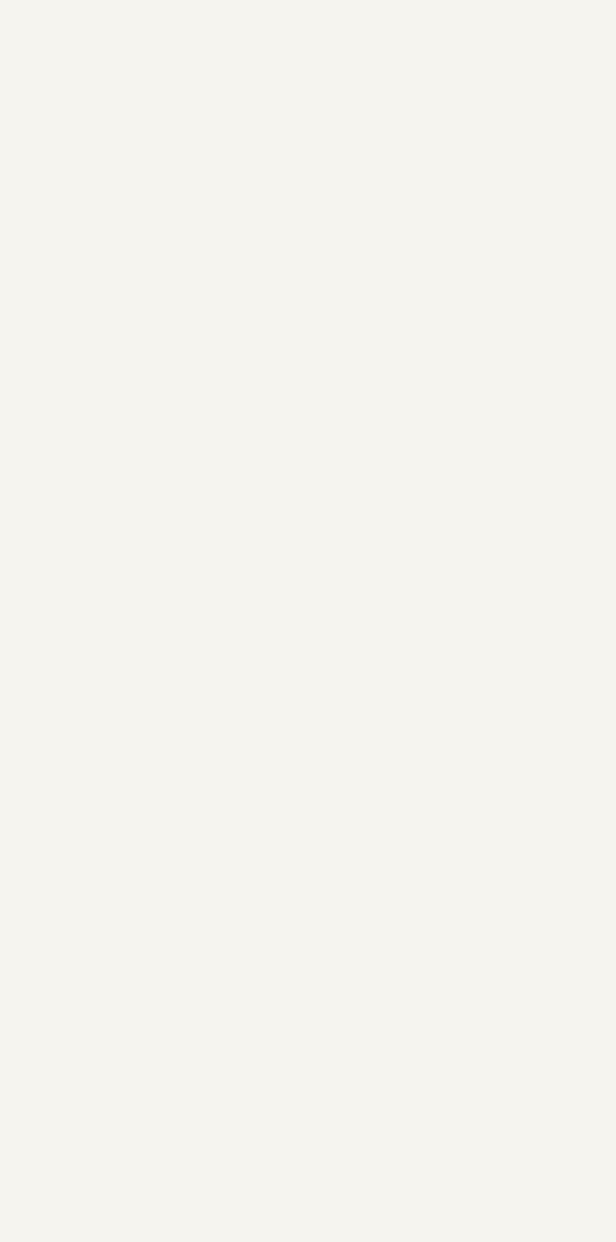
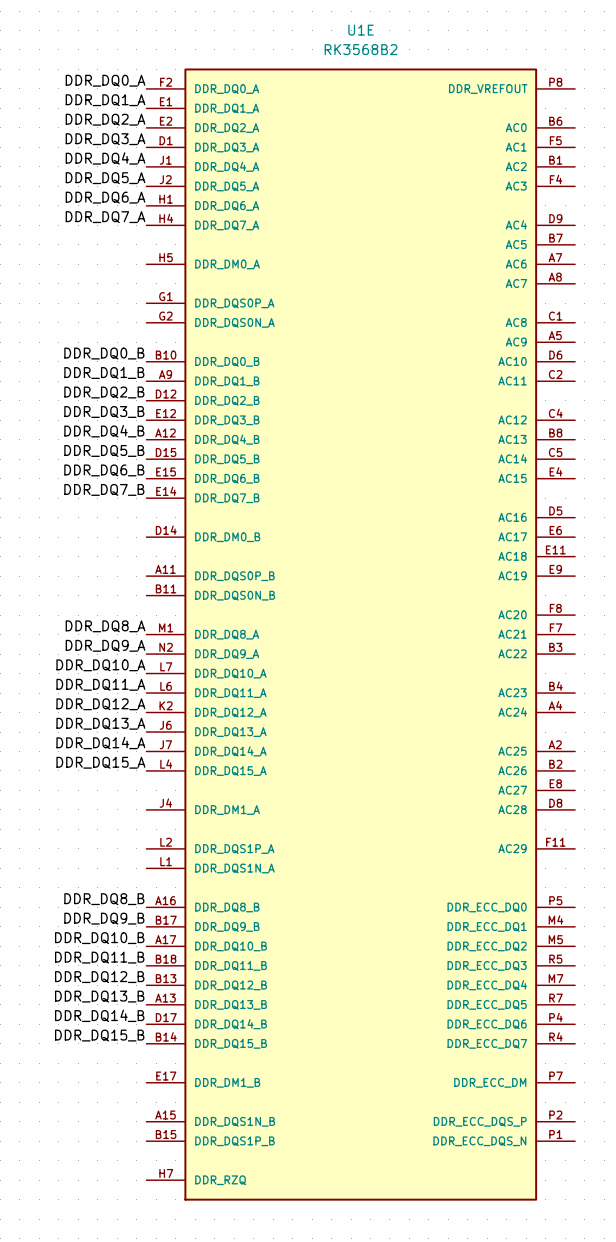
label: none -> DDR_DQ0_A (105, 80)
label: none -> DDR_DQ1_A (105, 100)
label: none -> DDR_DQ2_A (105, 119)
label: none -> DDR_DQ3_A (105, 139)
label: none -> DDR_DQ4_A (105, 158)
label: none -> DDR_DQ5_A (105, 178)
label: none -> DDR_DQ6_A (105, 197)
label: none -> DDR_DQ7_A (105, 217)
label: none -> DDR_DQ0_B (104, 353)
label: none -> DDR_DQ1_B (104, 373)
label: none -> DDR_DQ2_B (104, 392)
label: none -> DDR_DQ3_B (104, 411)
label: none -> DDR_DQ4_B (104, 431)
label: none -> DDR_DQ5_B (104, 450)
label: none -> DDR_DQ6_B (104, 470)
label: none -> DDR_DQ7_B (104, 489)
label: none -> DDR_DQ8_A (105, 626)
U1E: none -> RK3568B2 (360, 634)
label: none -> DDR_DQ9_A (105, 645)
label: none -> DDR_DQ10_A (100, 665)
label: none -> DDR_DQ11_A (100, 684)
label: none -> DDR_DQ12_A (100, 704)
label: none -> DDR_DQ13_A (100, 723)
label: none -> DDR_DQ14_A (100, 743)
label: none -> DDR_DQ15_A (100, 762)
label: none -> DDR_DQ8_B (104, 899)
label: none -> DDR_DQ9_B (104, 918)
label: none -> DDR_DQ10_B (99, 938)
label: none -> DDR_DQ11_B (99, 957)
label: none -> DDR_DQ12_B (99, 977)
label: none -> DDR_DQ13_B (99, 996)
label: none -> DDR_DQ14_B (99, 1015)
label: none -> DDR_DQ15_B (99, 1035)

